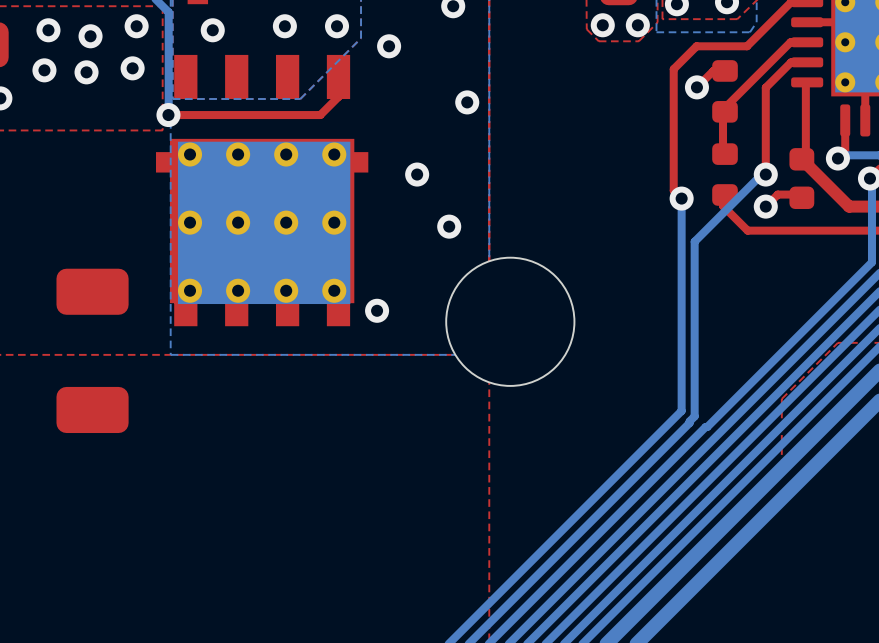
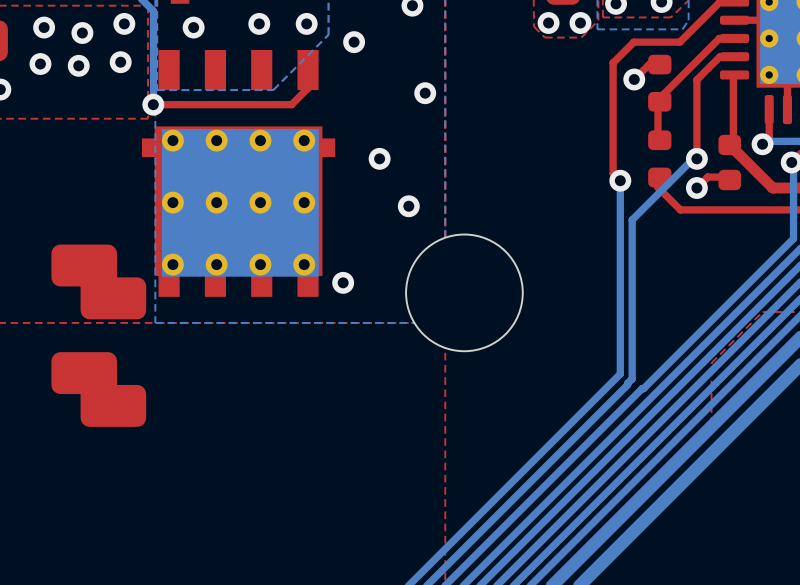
part: none -> (113, 352)

